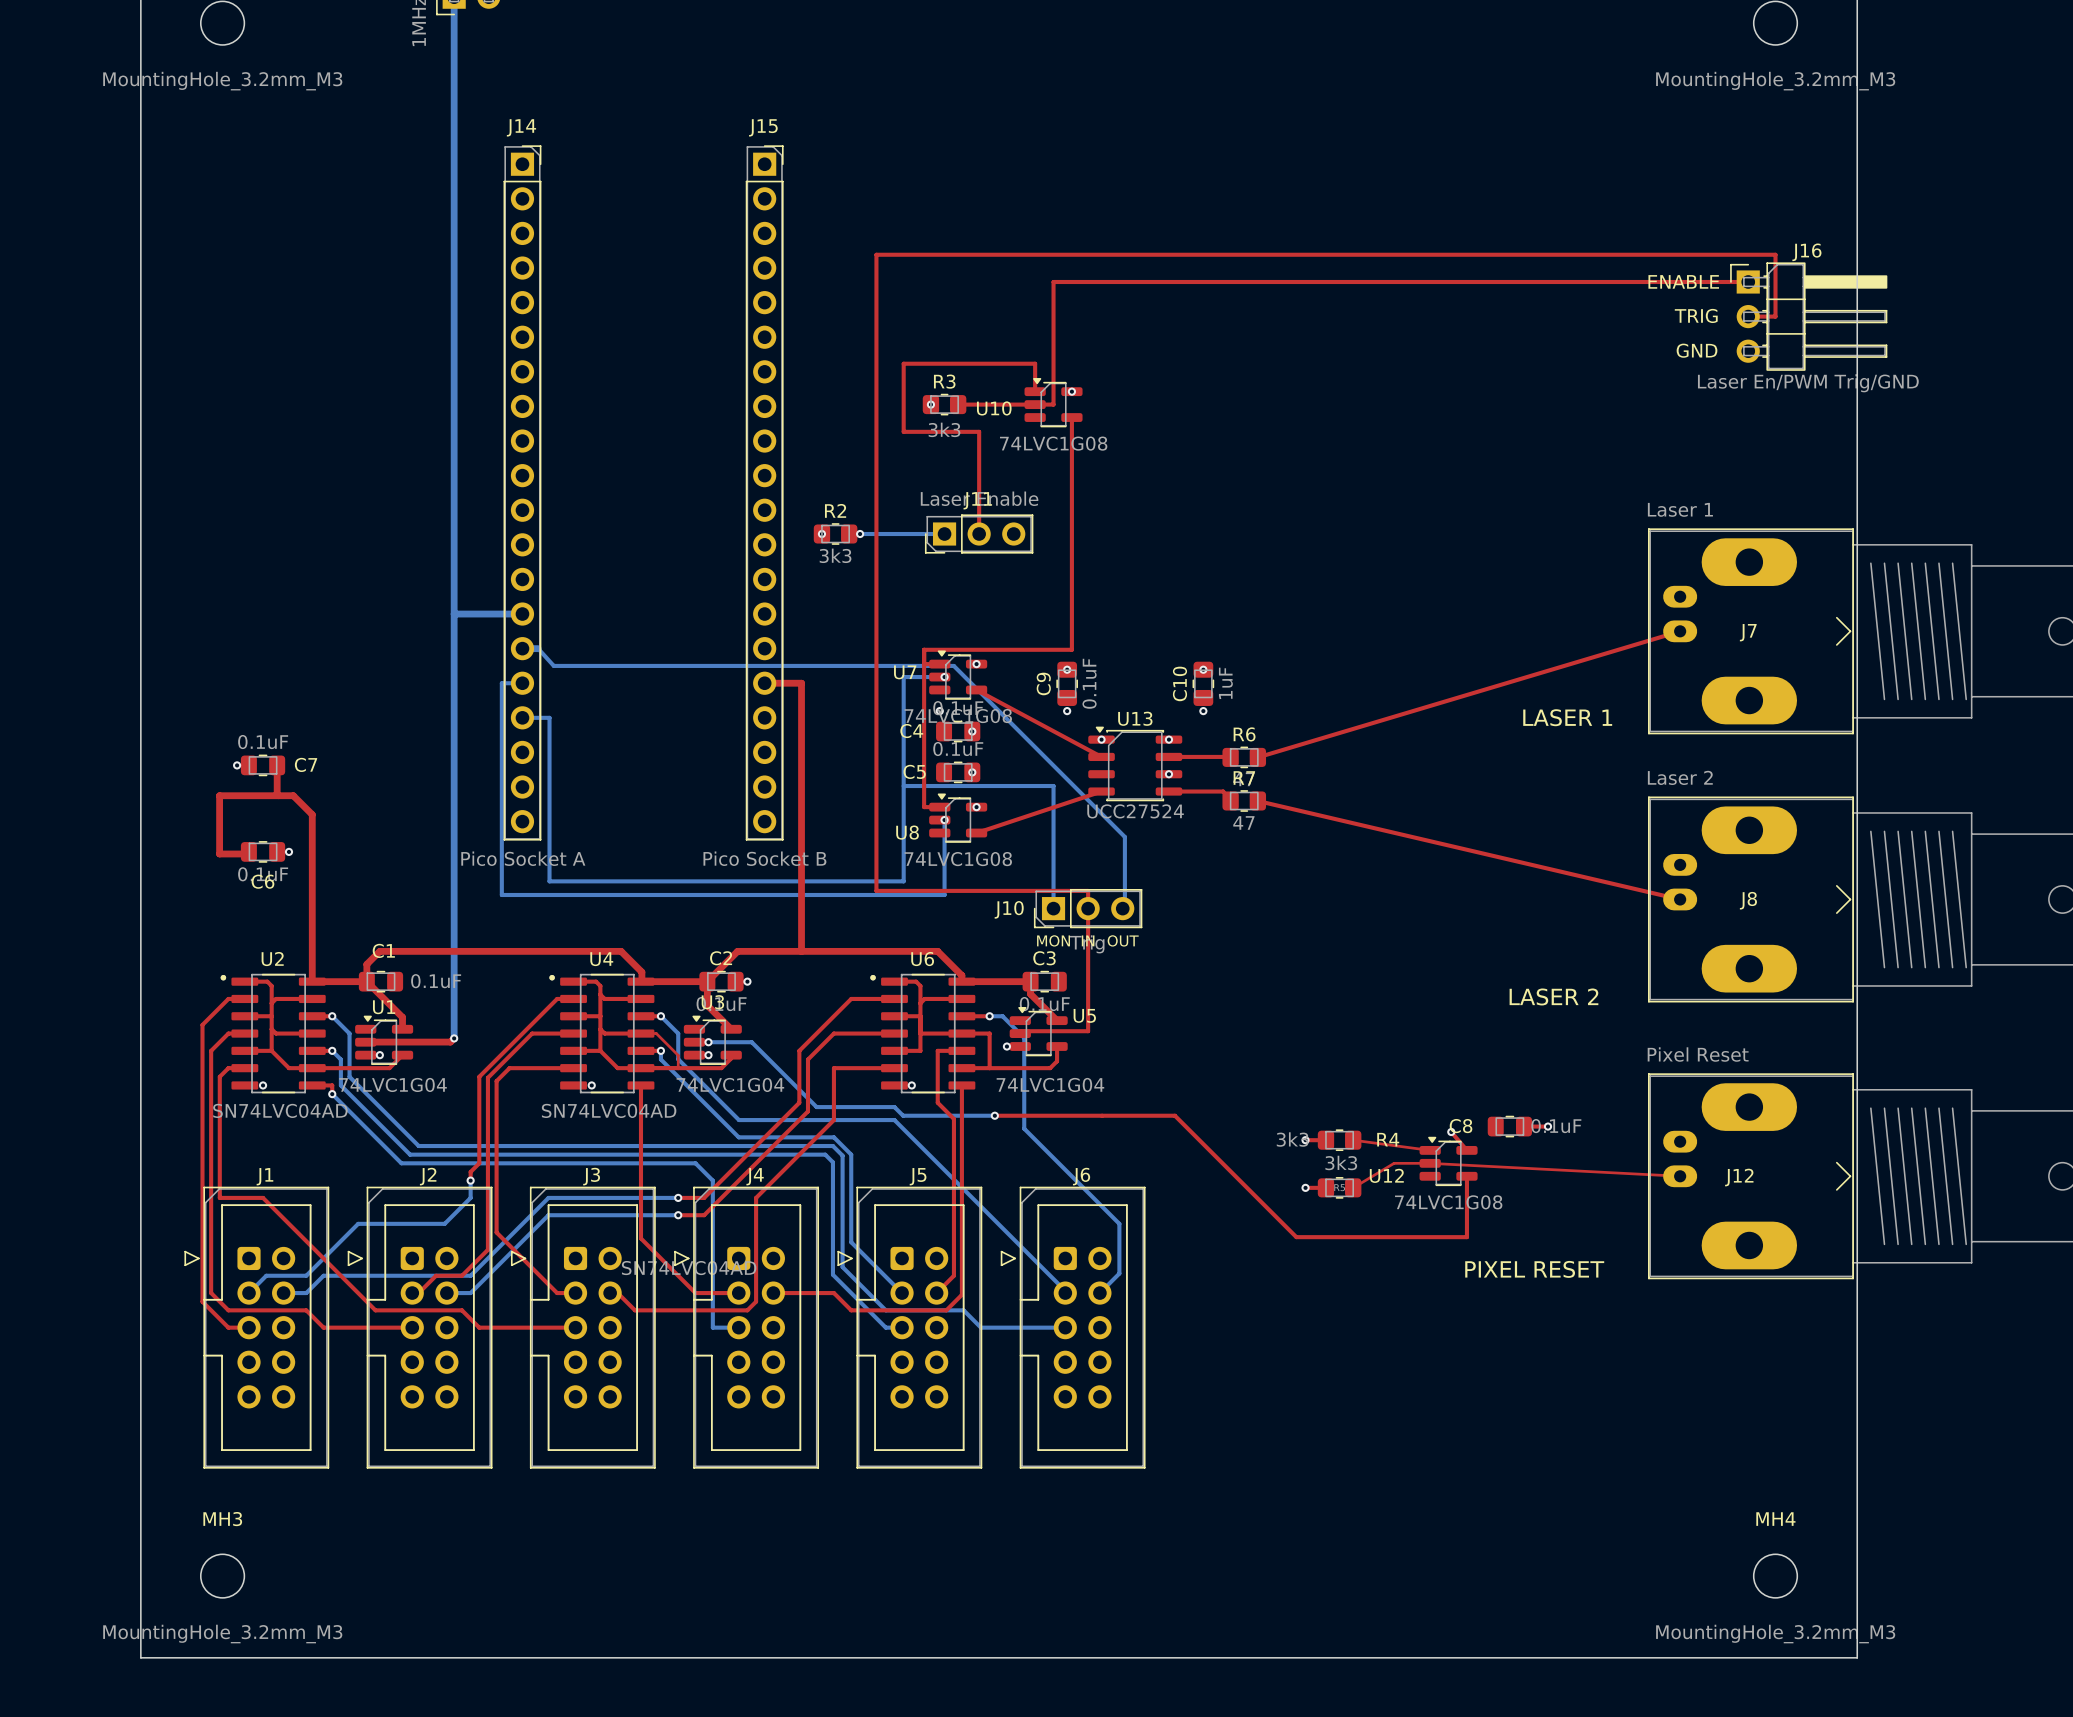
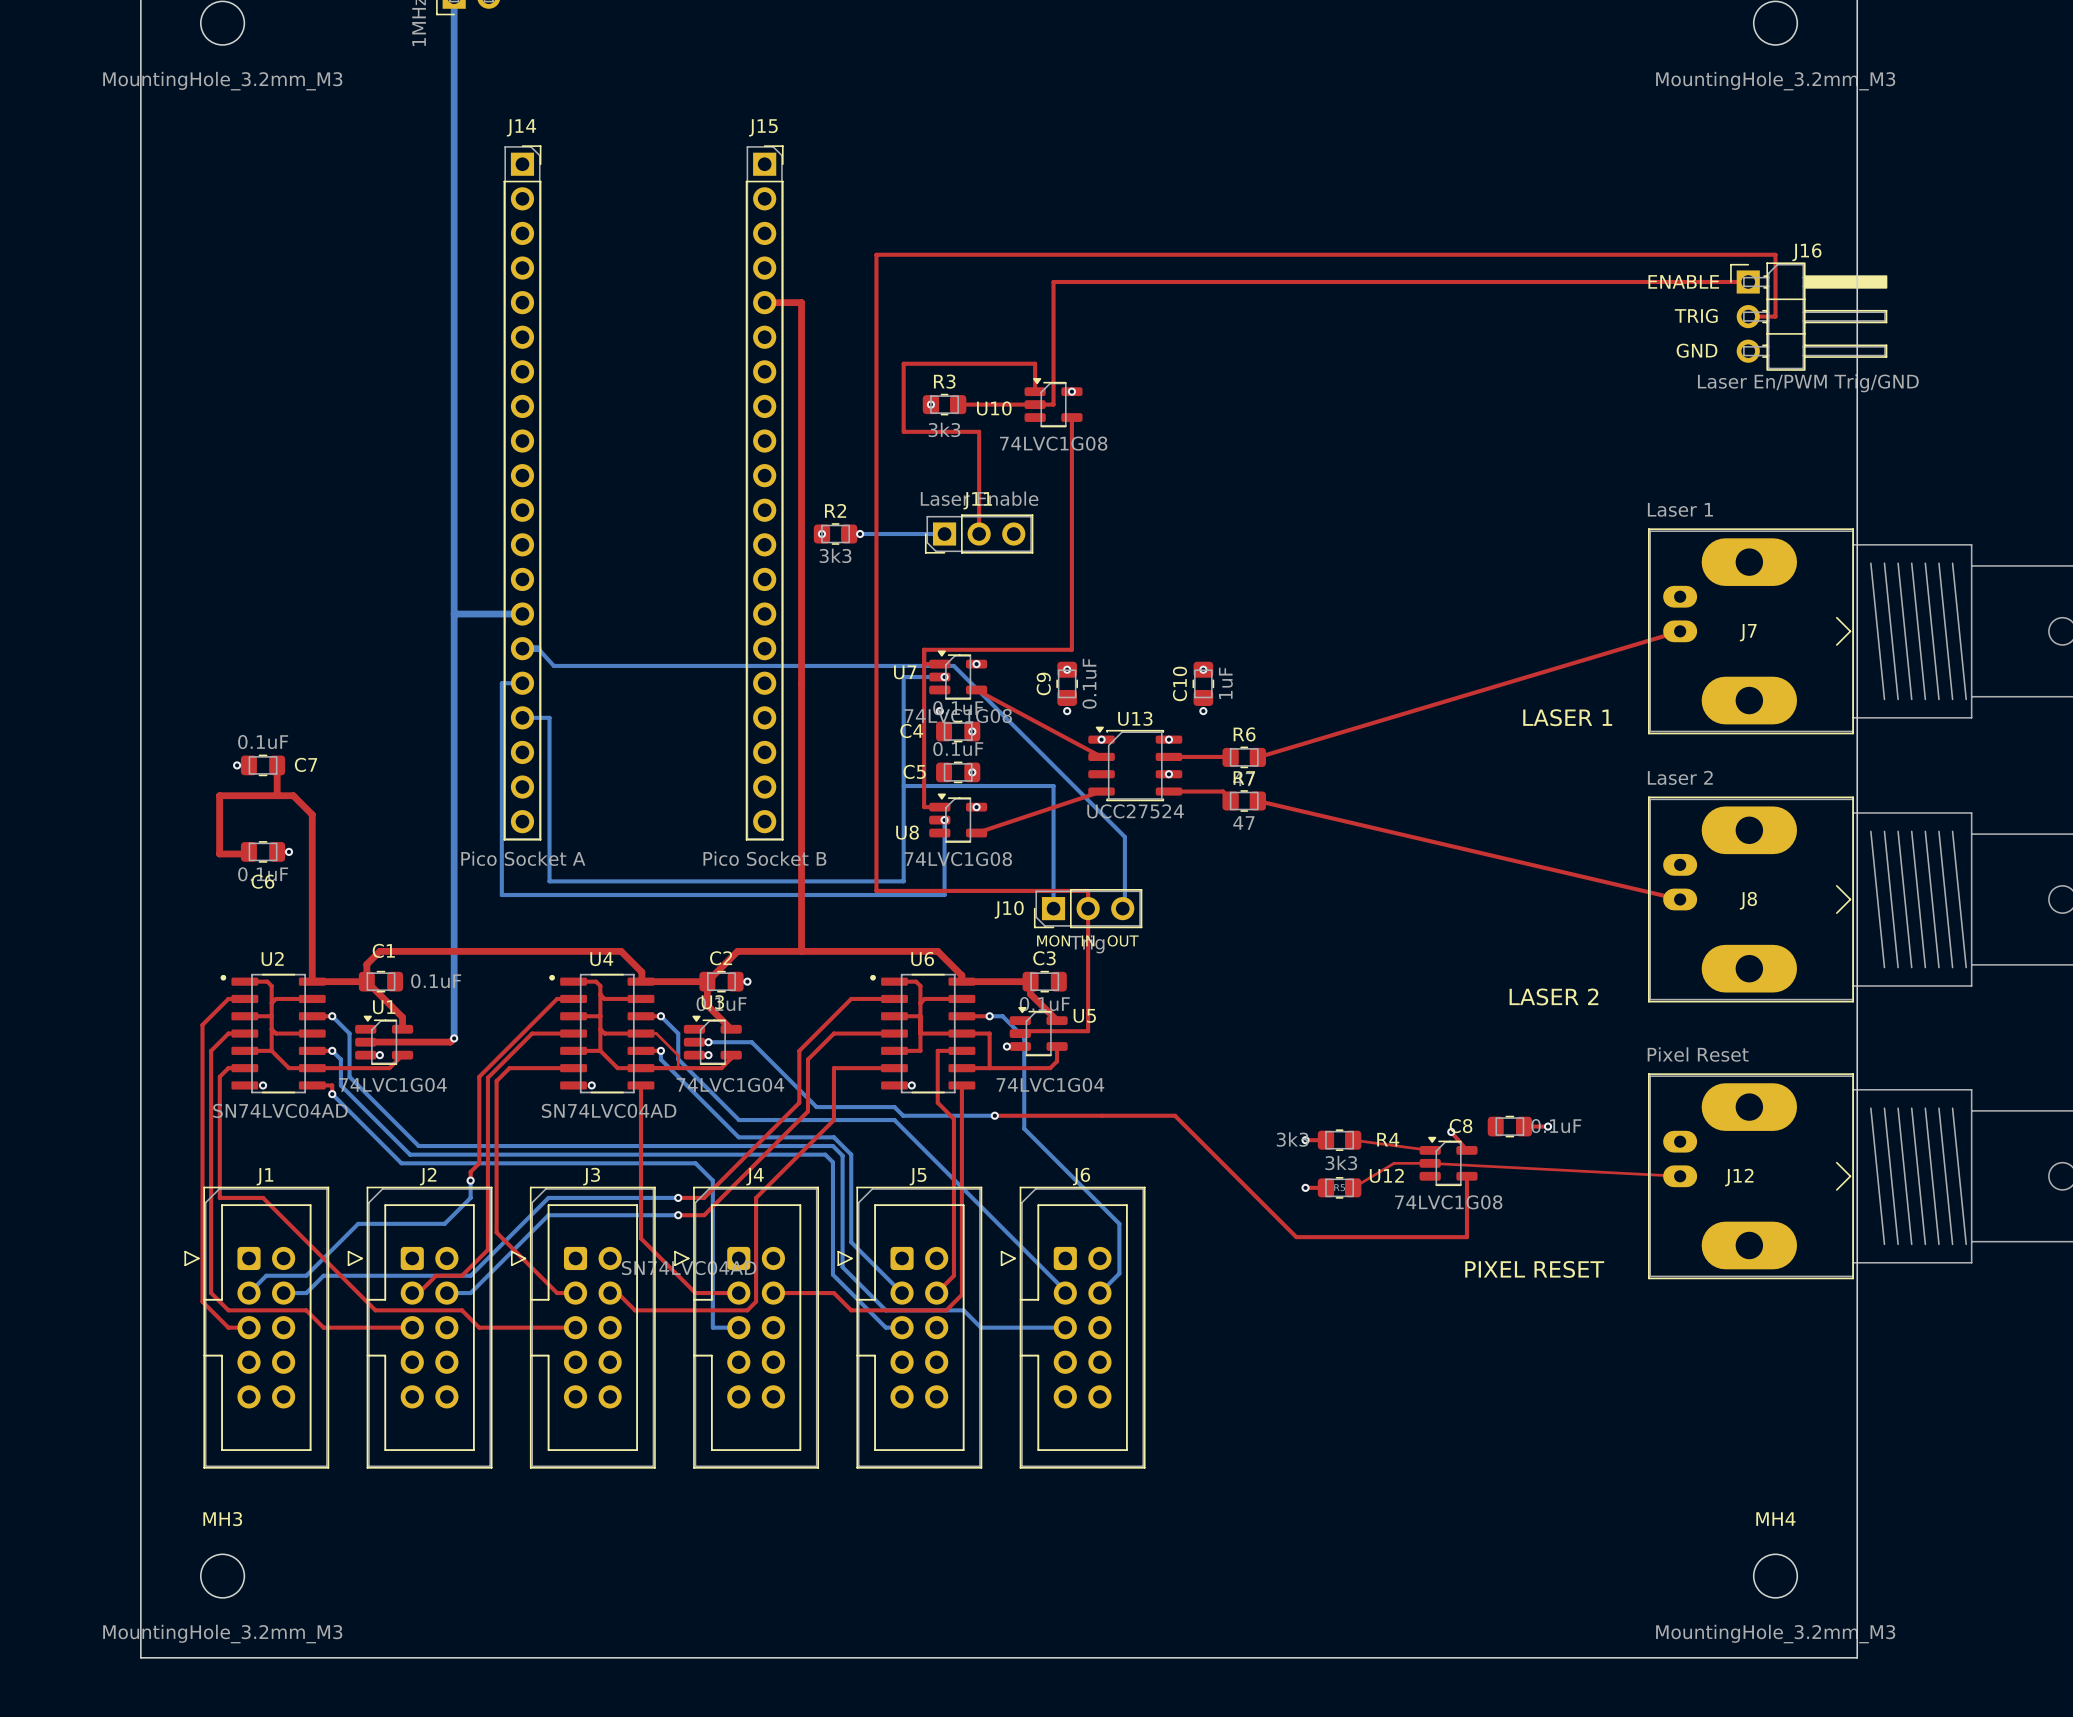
top track: (764, 683) (801, 683) -> (764, 302) (801, 302) (801, 683)

